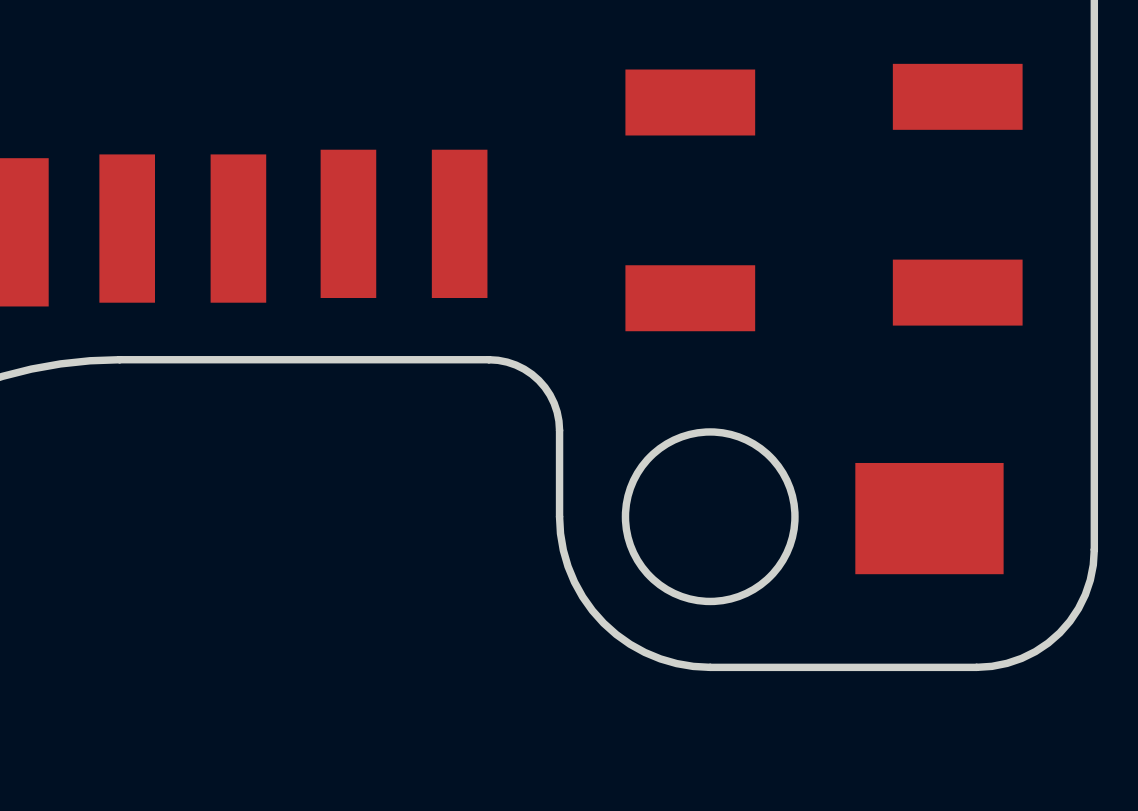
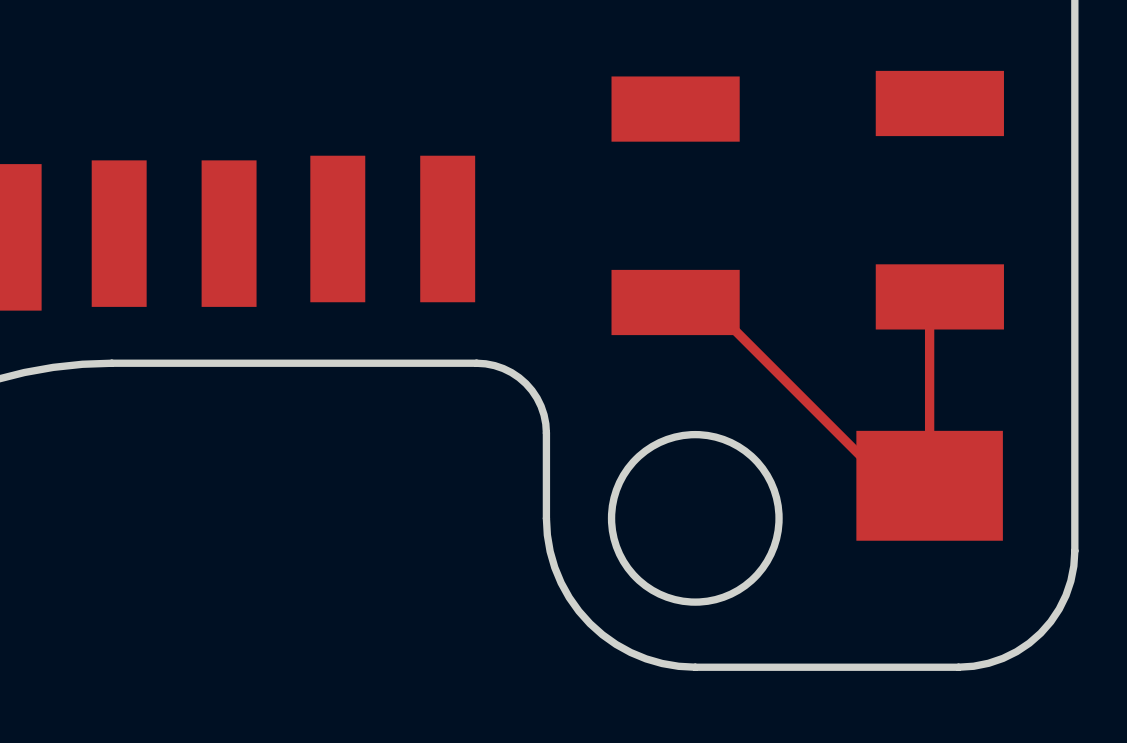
top track: none -> (939, 296) (929, 307) (929, 485) (890, 485) (707, 302) (675, 302)
part position: (929, 518) -> (929, 485)

